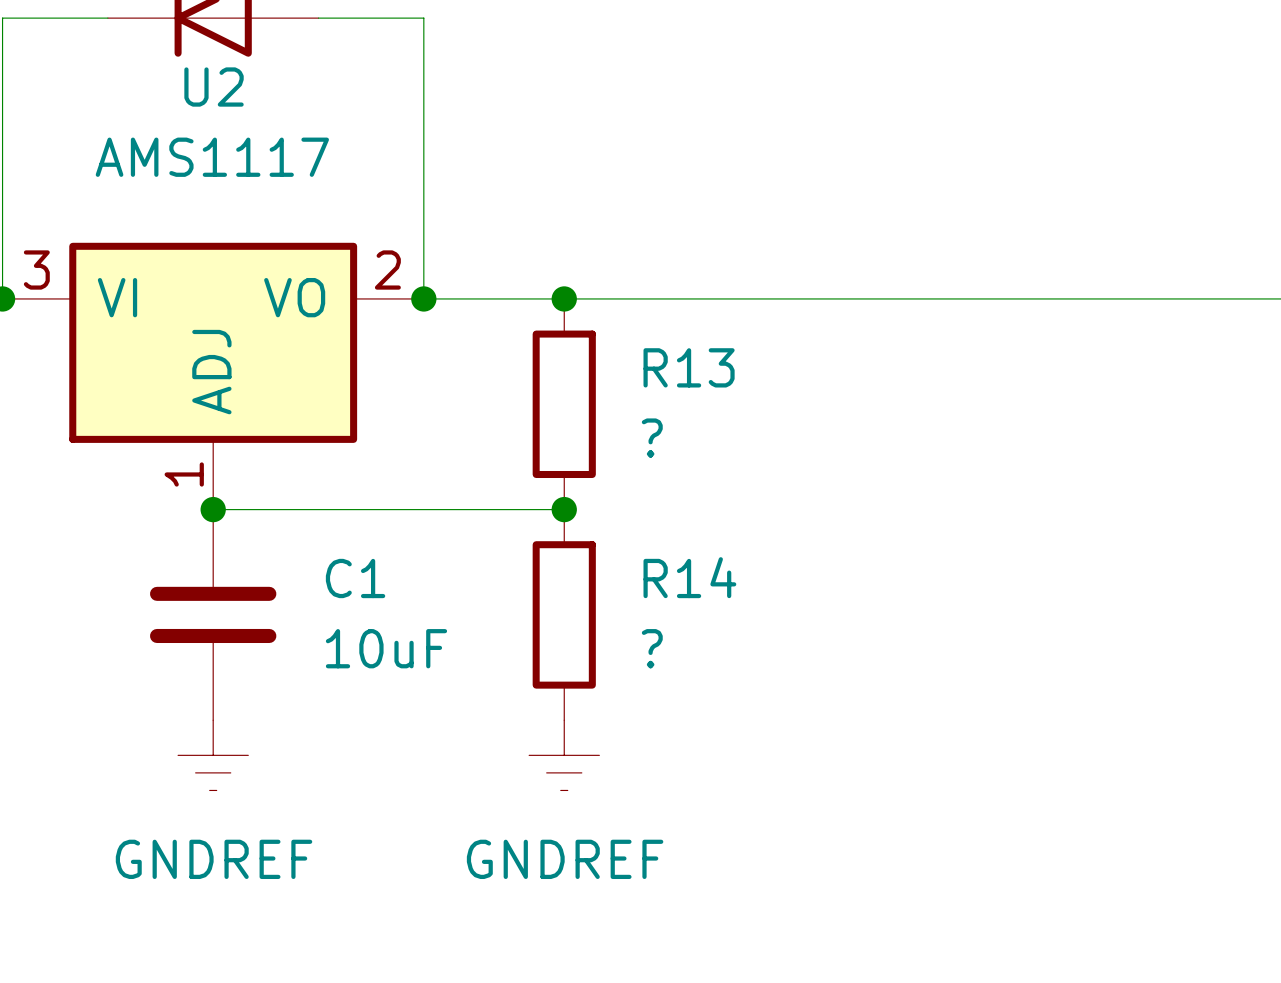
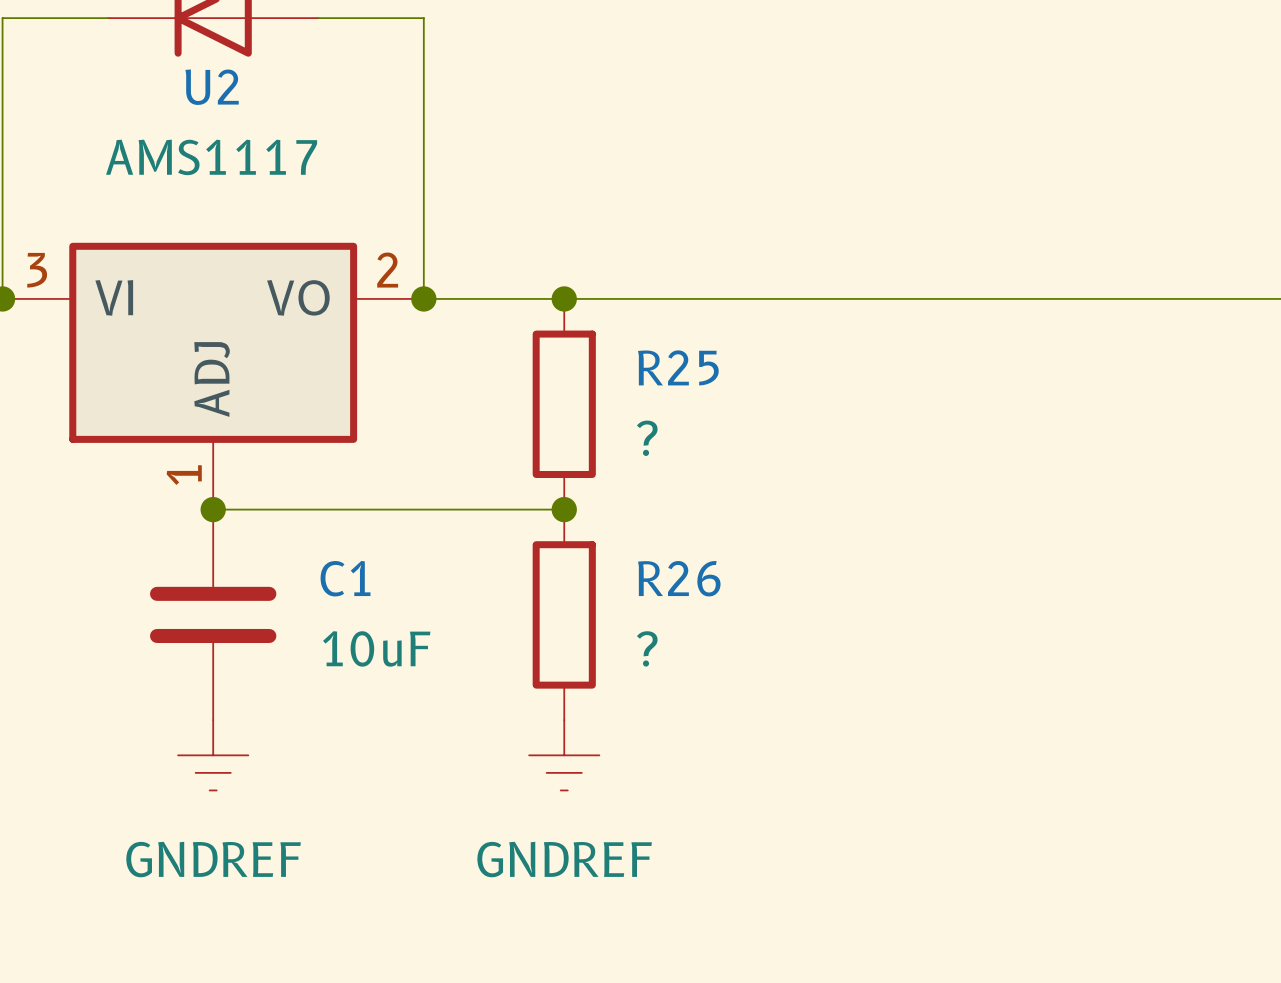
R13 name: R13 (689, 367) -> R25 (678, 367)
R14 name: R14 (689, 577) -> R26 (679, 578)

